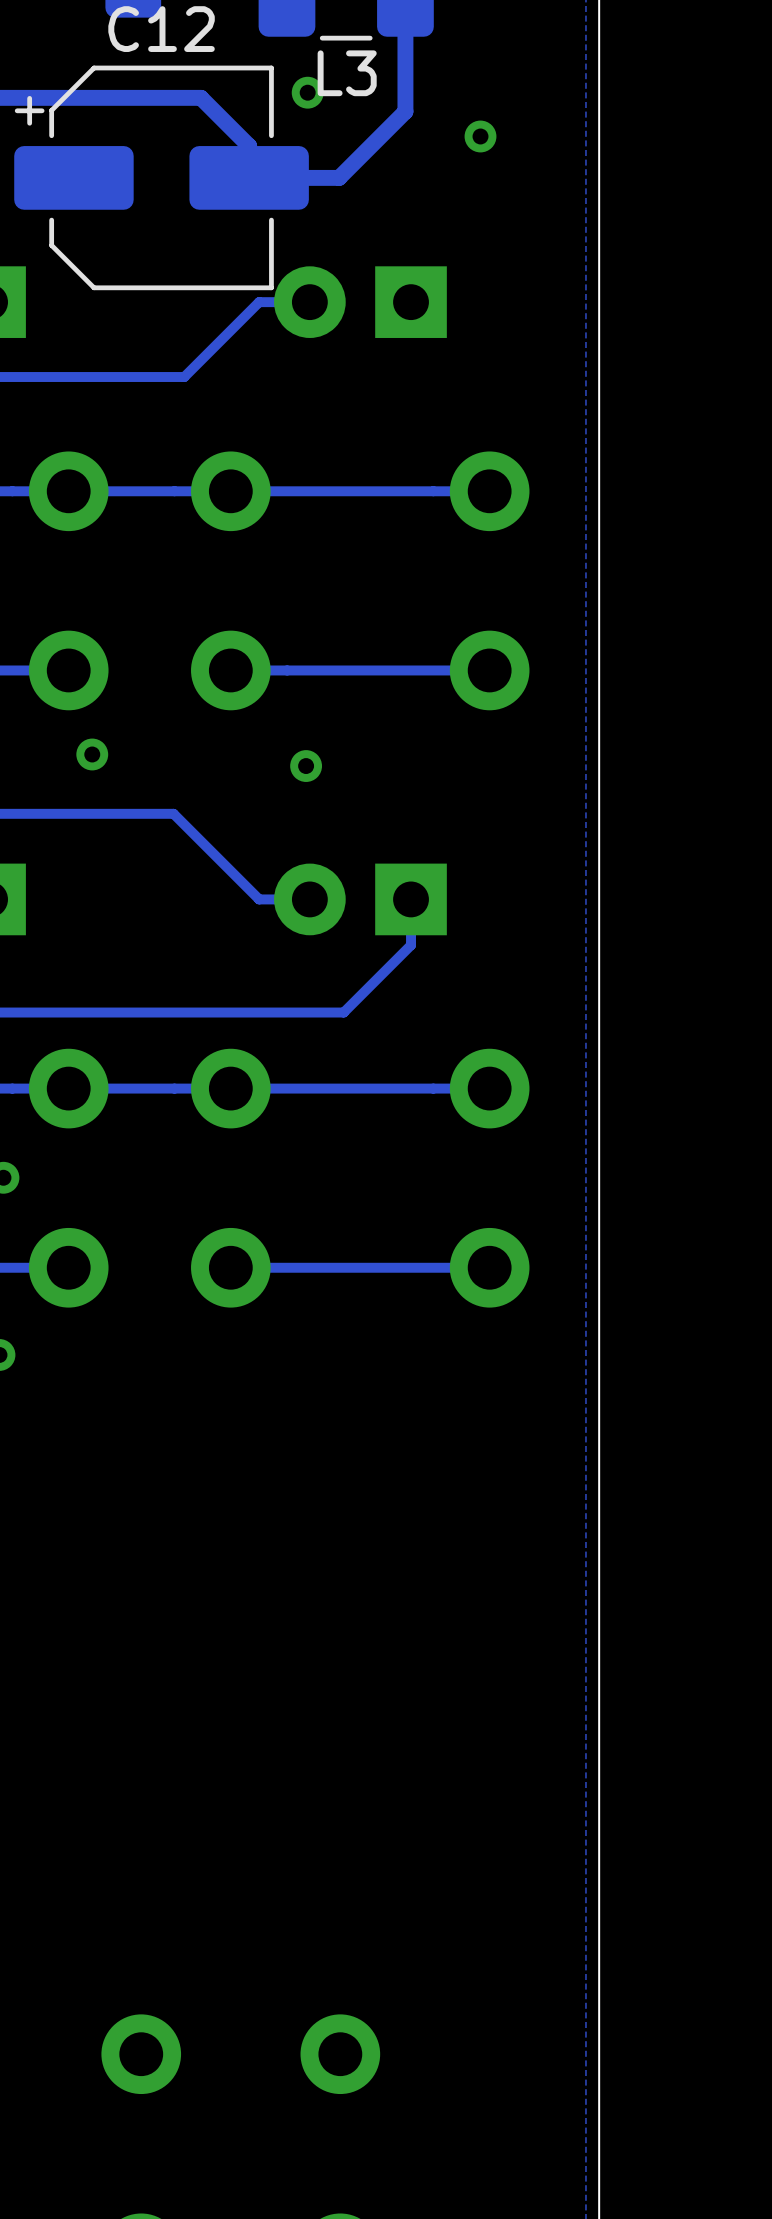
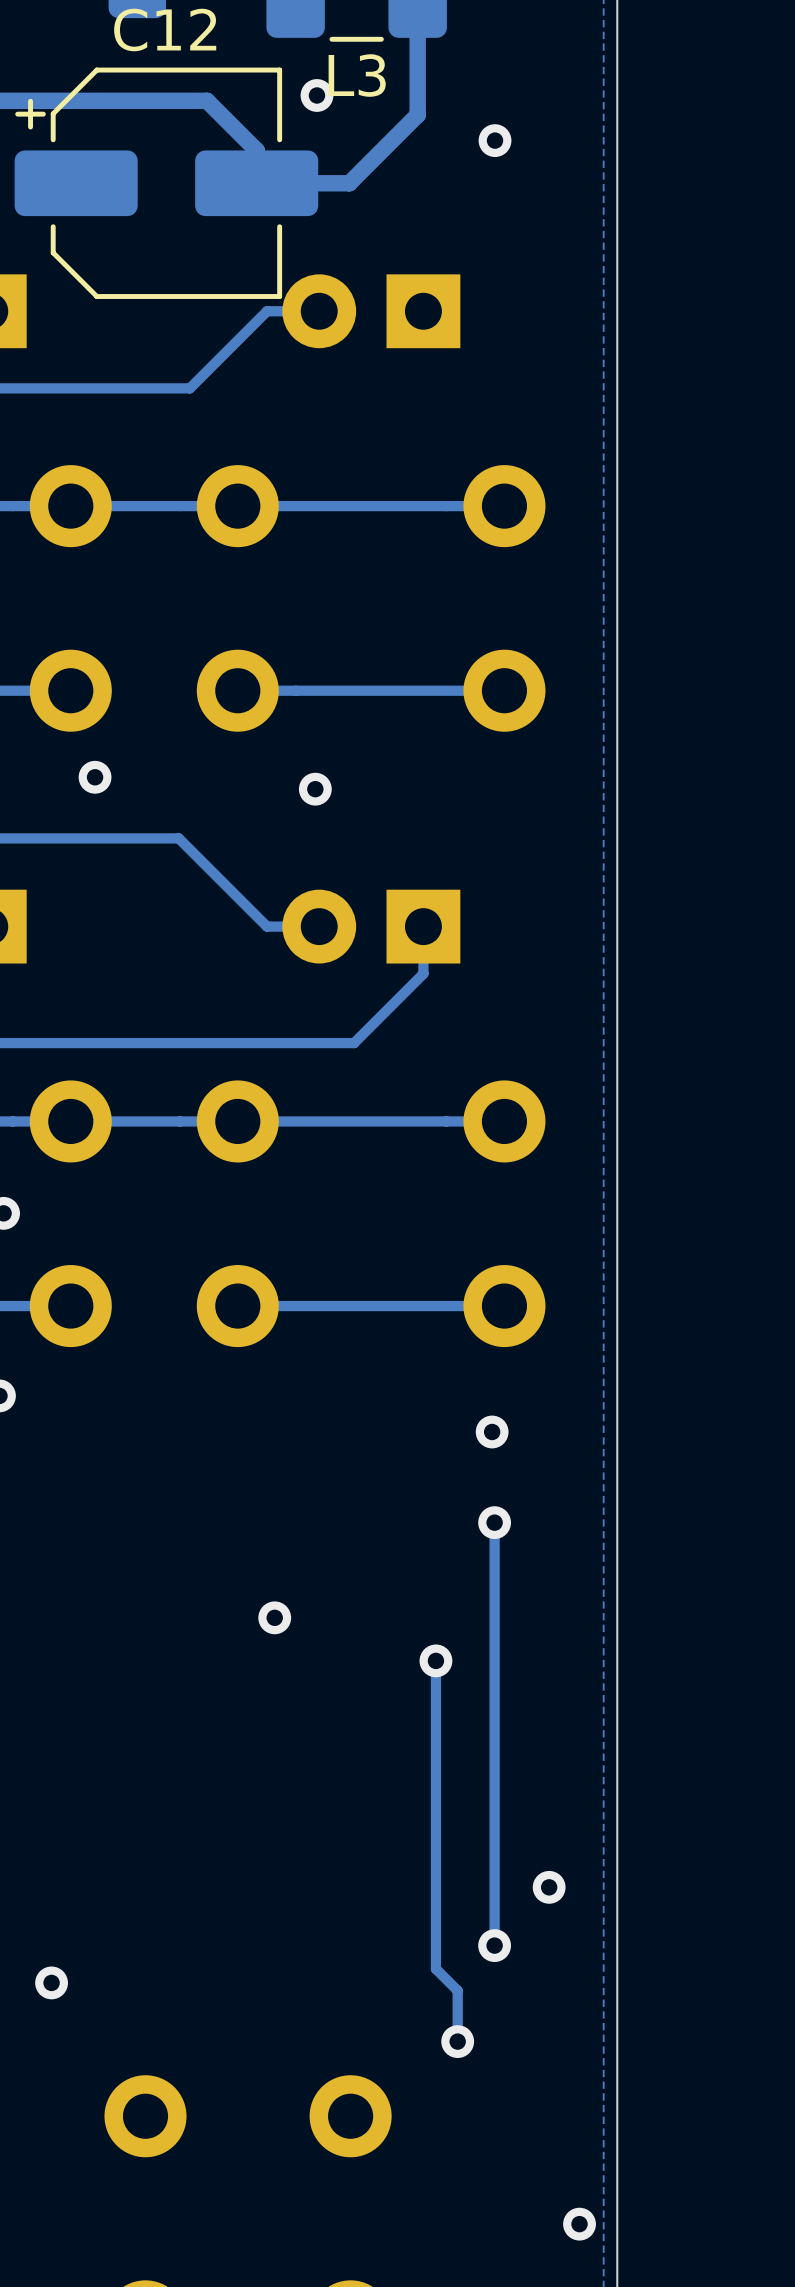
via: none -> (492, 1432)
track: none -> (494, 1522) (494, 1945) (499, 1950)
via: none -> (494, 1522)
via: none -> (274, 1617)
track: none -> (435, 1660) (435, 1968) (457, 1990) (457, 2041)
via: none -> (435, 1660)
via: none -> (549, 1887)
via: none -> (494, 1945)
via: none -> (51, 1982)
via: none -> (457, 2041)
via: none -> (579, 2224)

